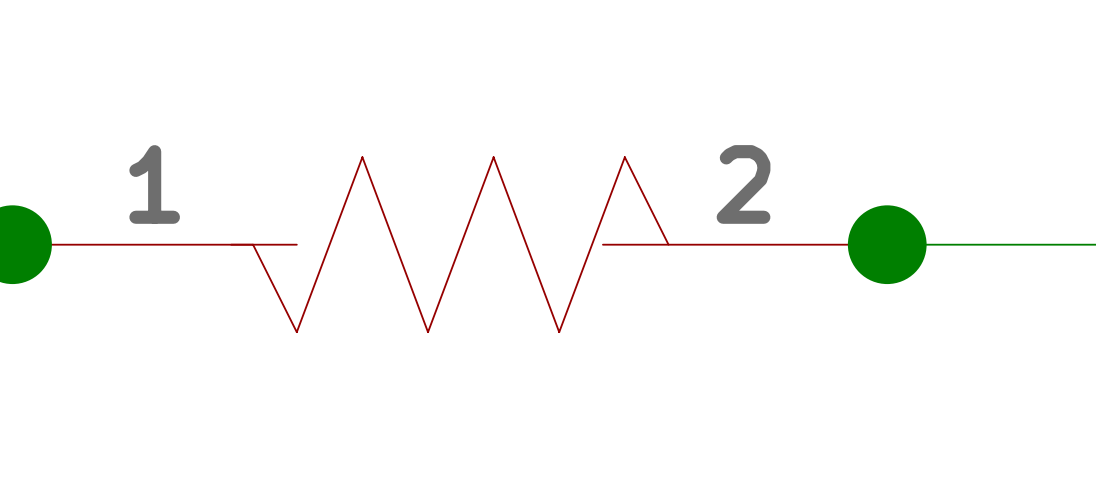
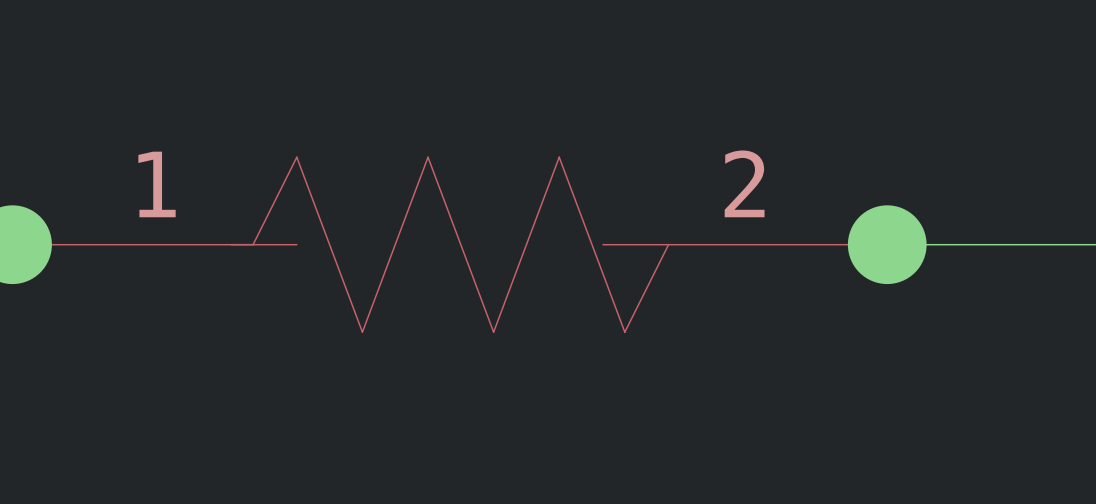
part flip: as is (449, 244) -> up-down (449, 244)

